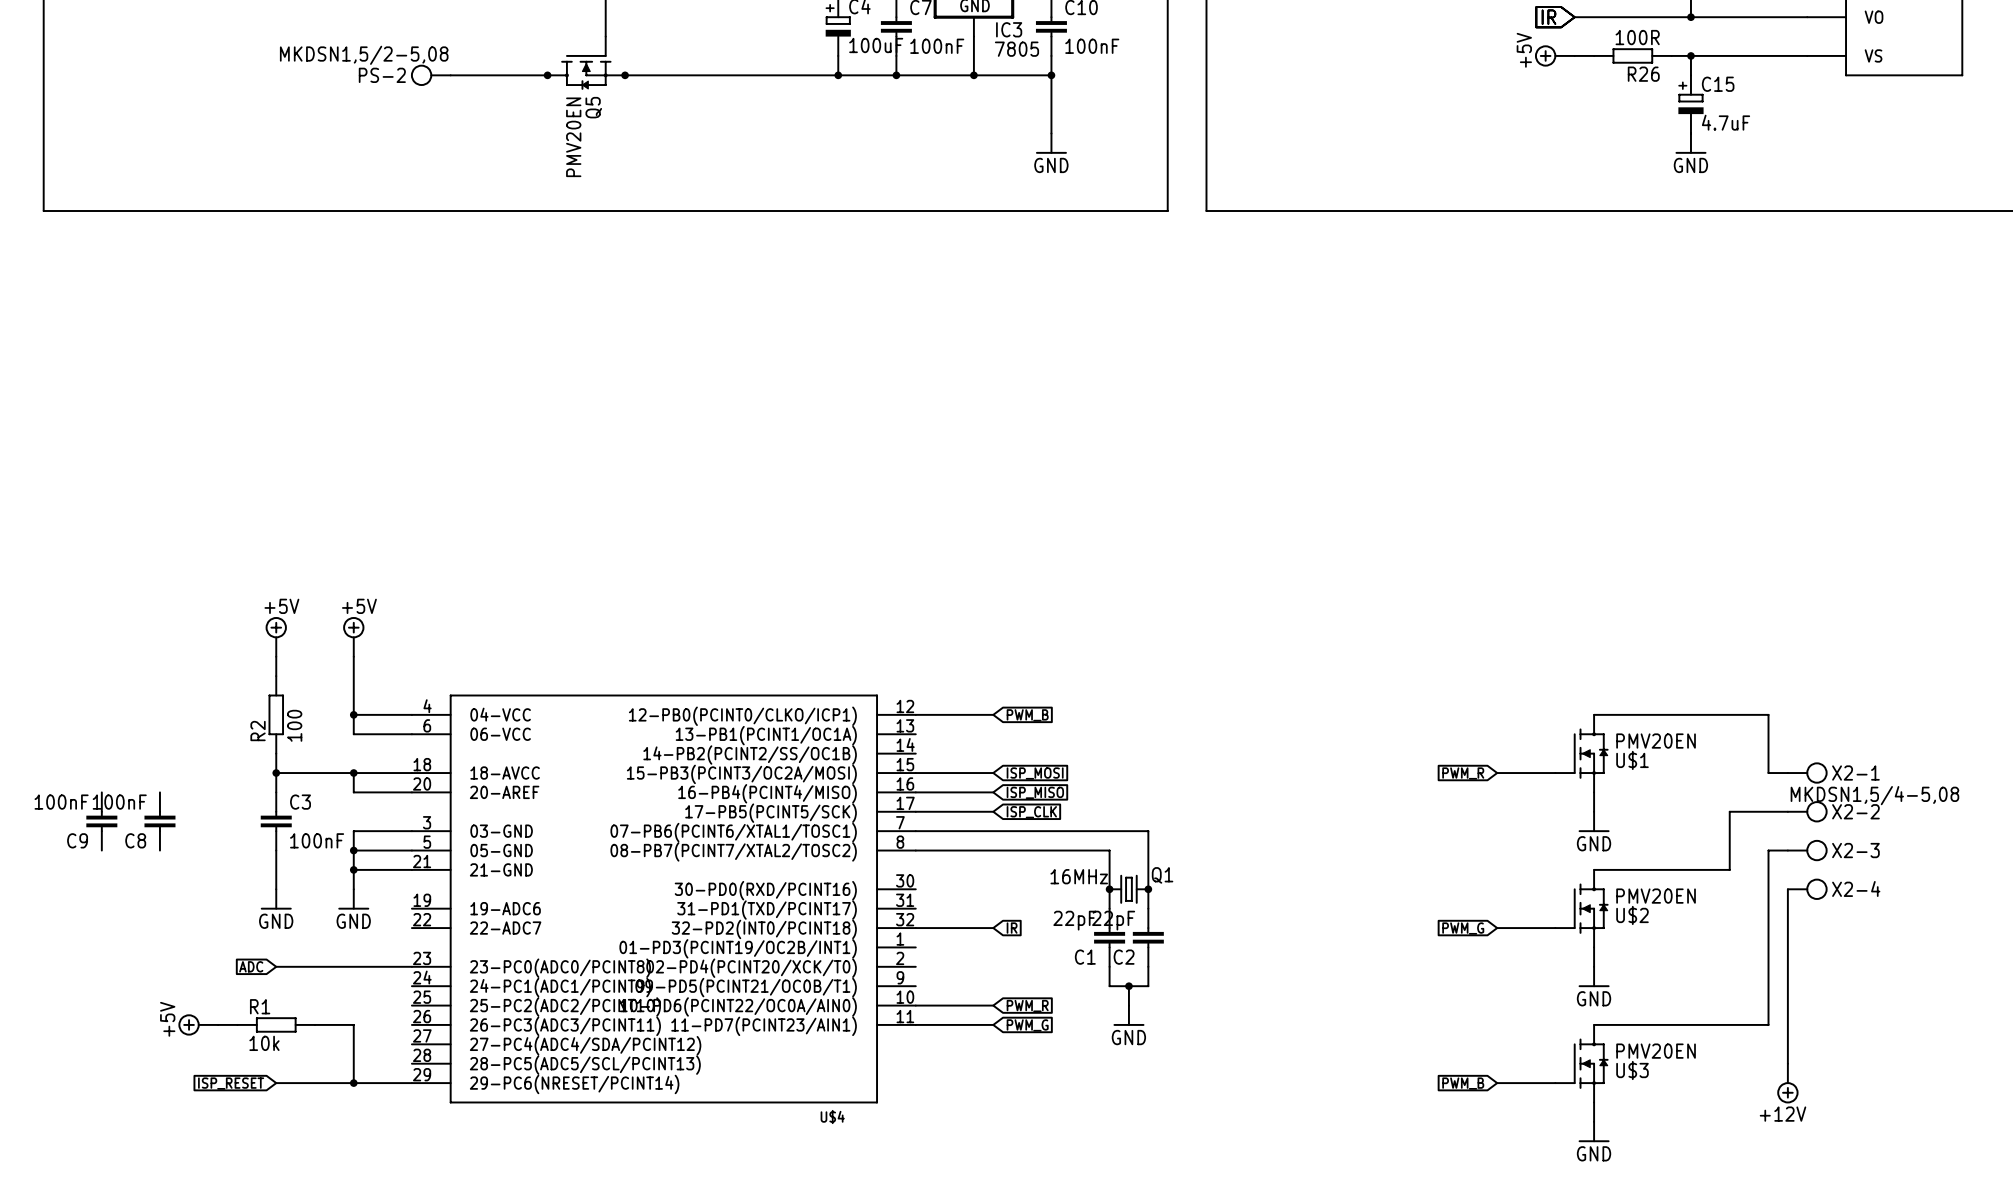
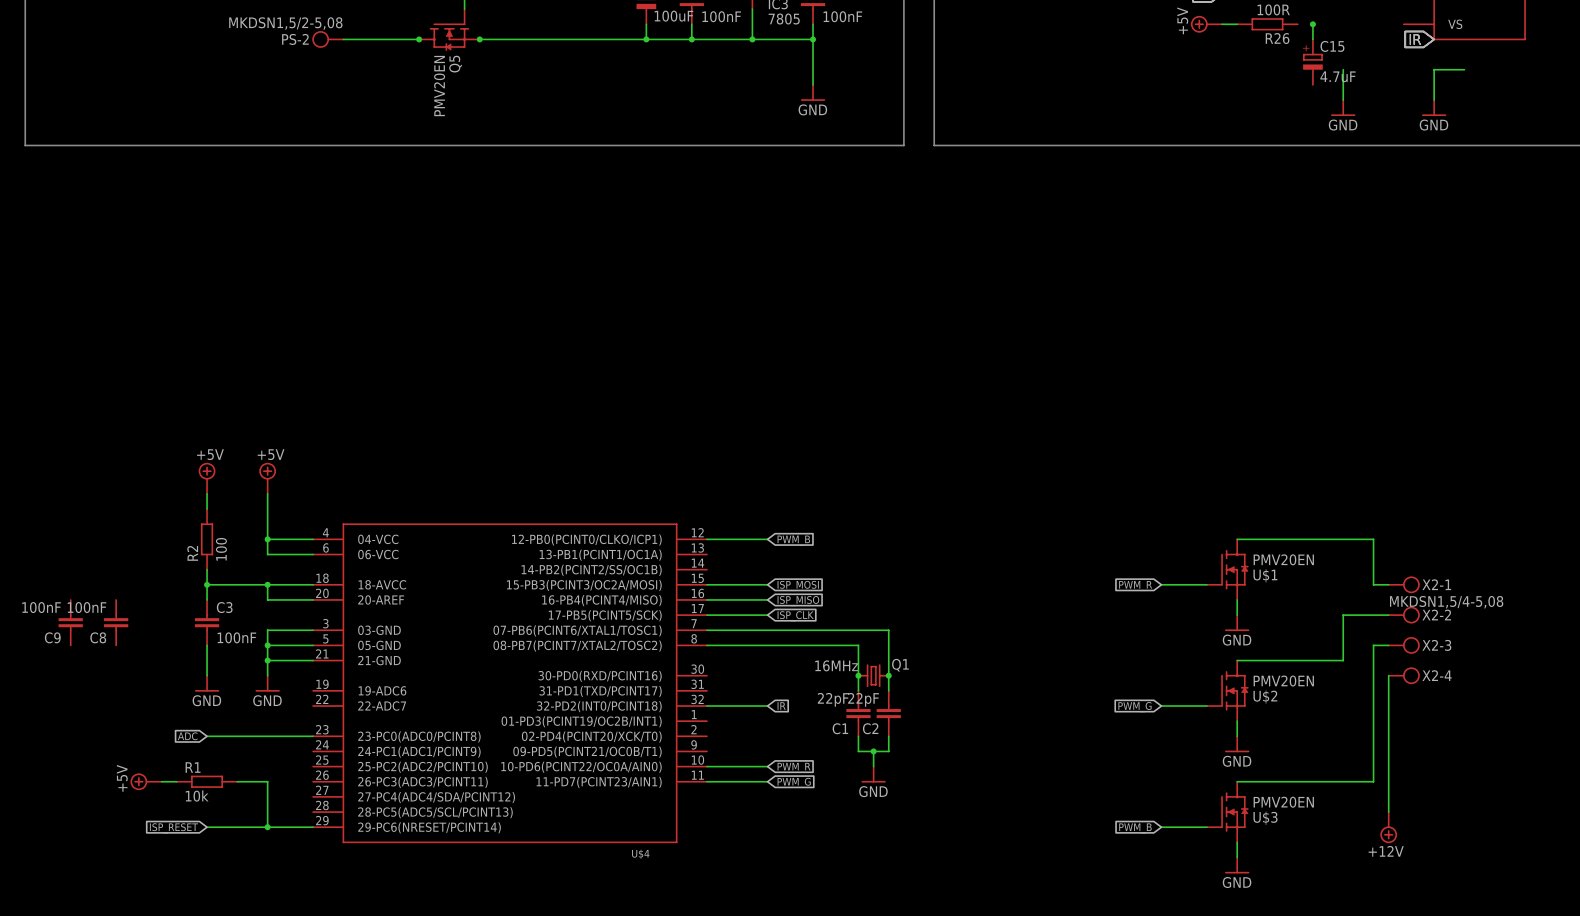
wire: (1671, 55) (1807, 55) -> none
global label: none -> IR (1415, 39)
wire: none -> (1343, 69) (1343, 100)
wire: none -> (1464, 69) (1434, 69) (1434, 100)
power symbol position: GND (1690, 143) -> GND (1343, 107)
power symbol: none -> GND (1434, 107)

